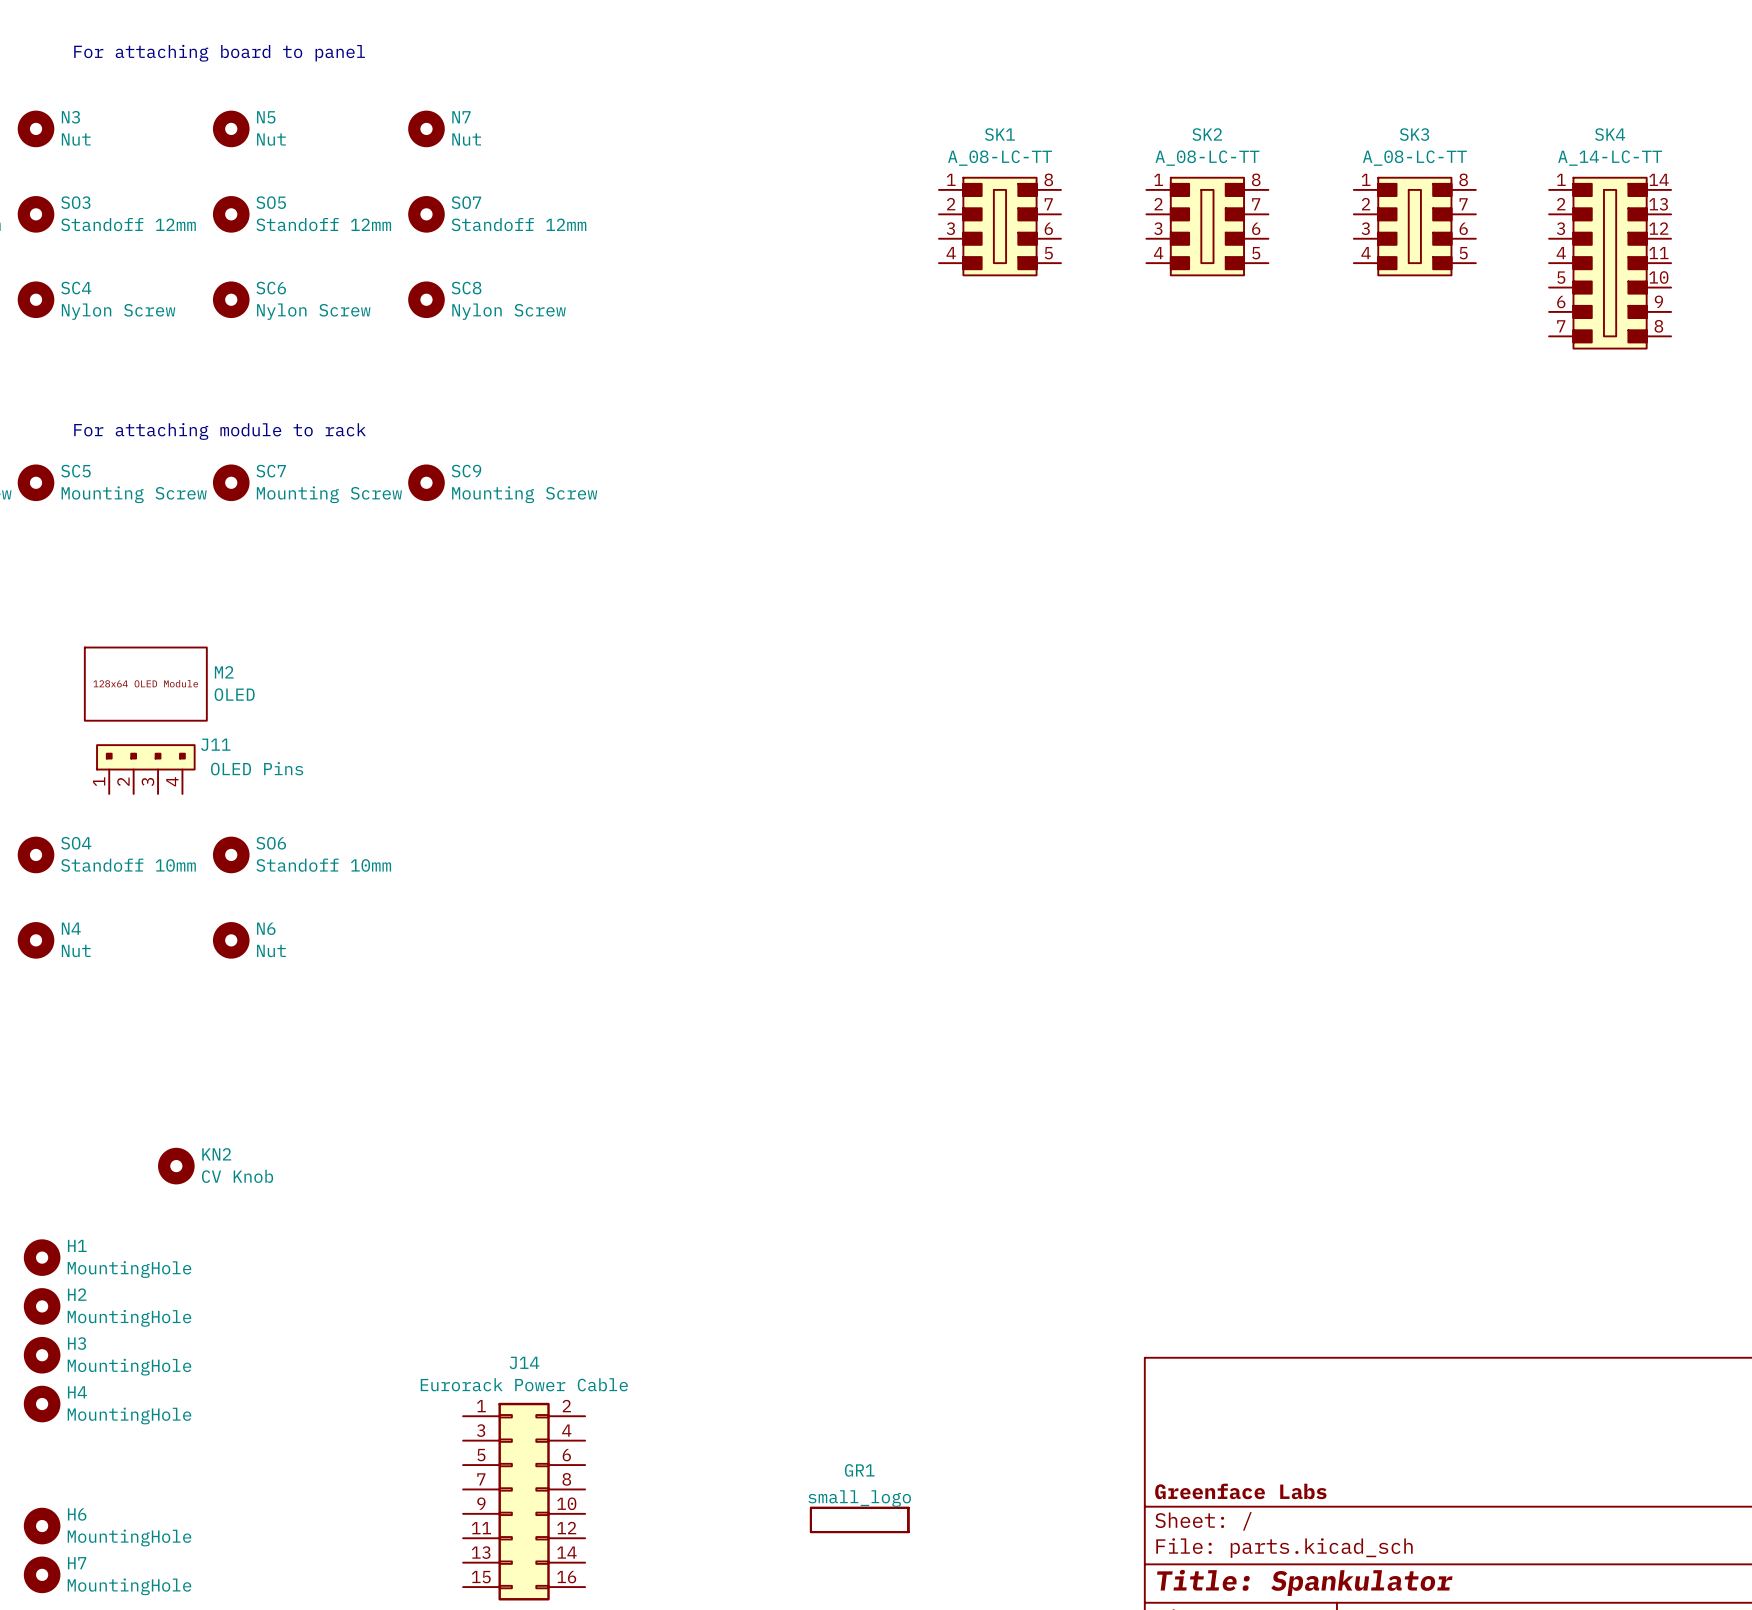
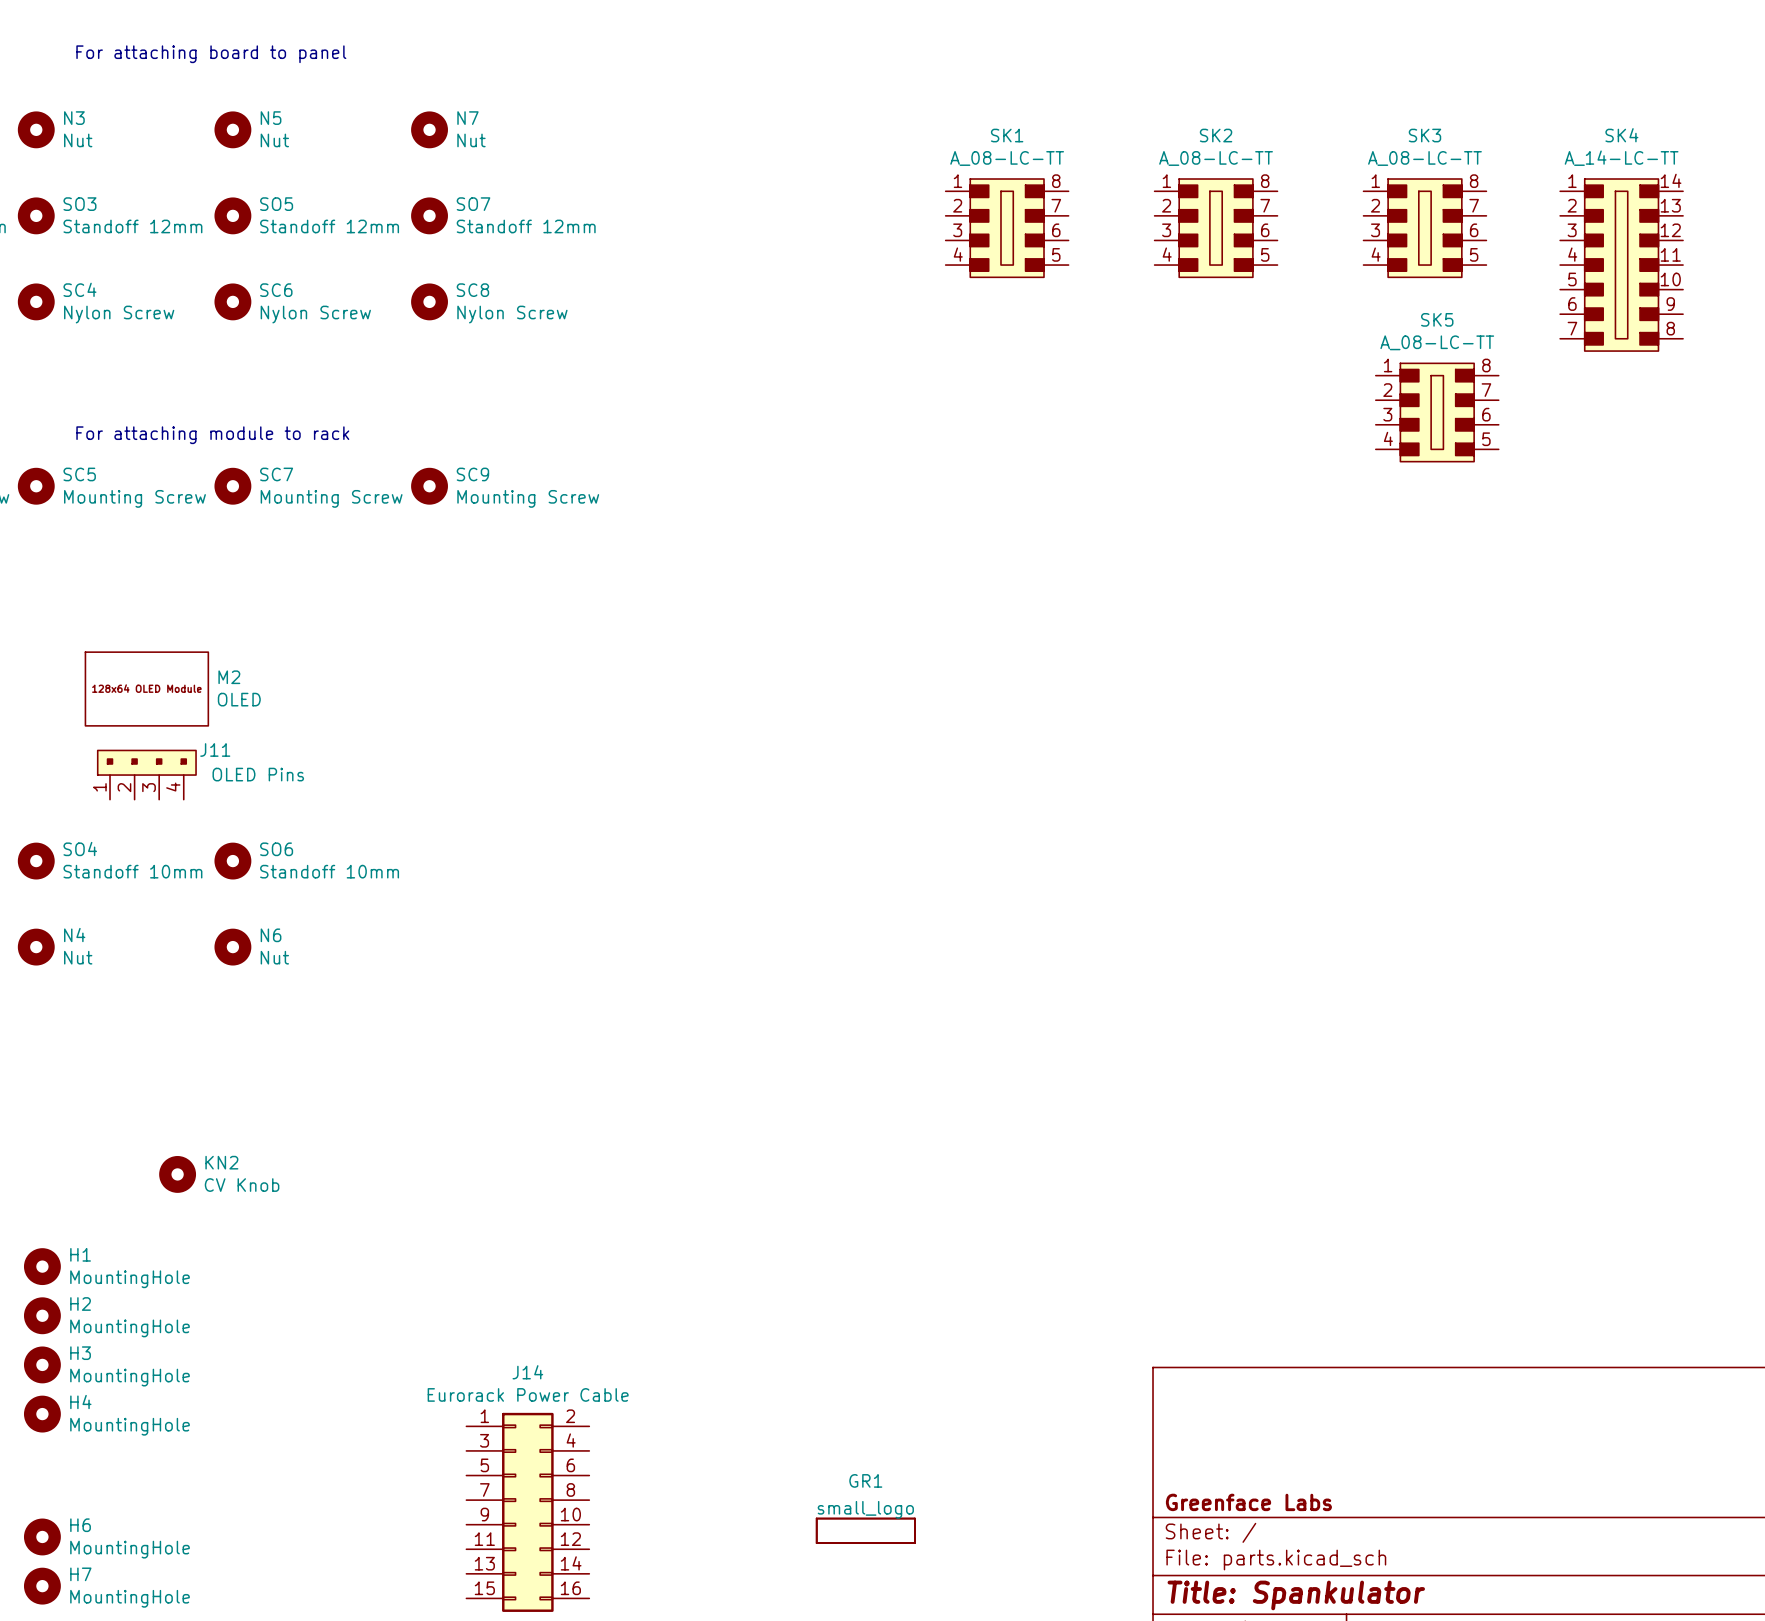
SK5: none -> A_08-LC-TT (1437, 412)

